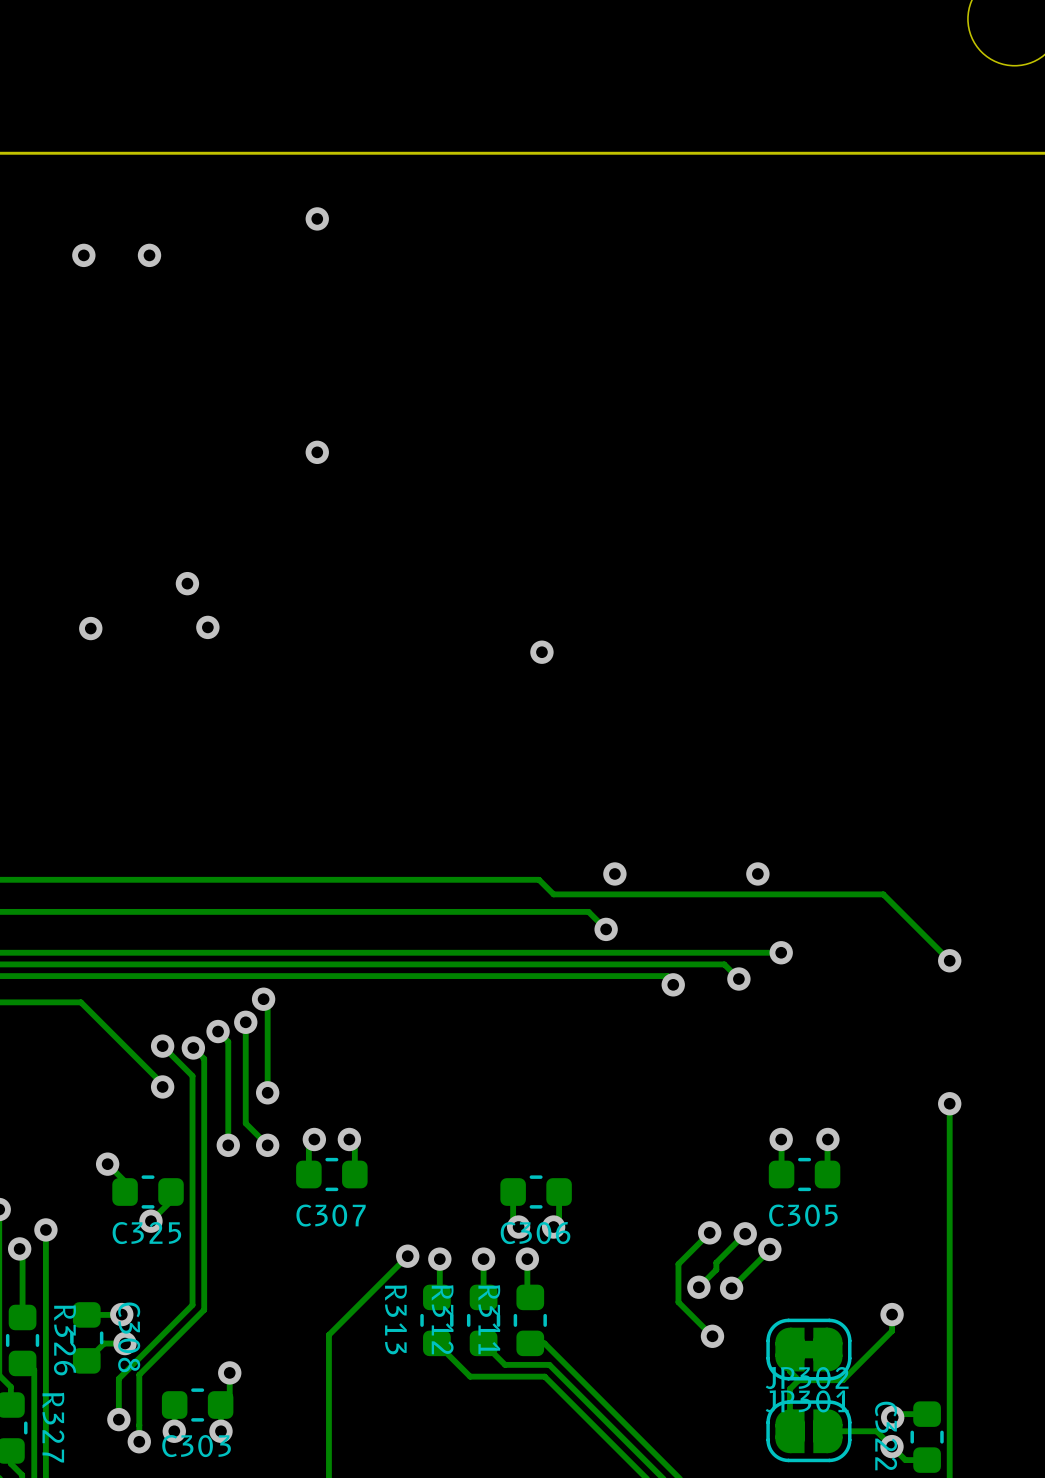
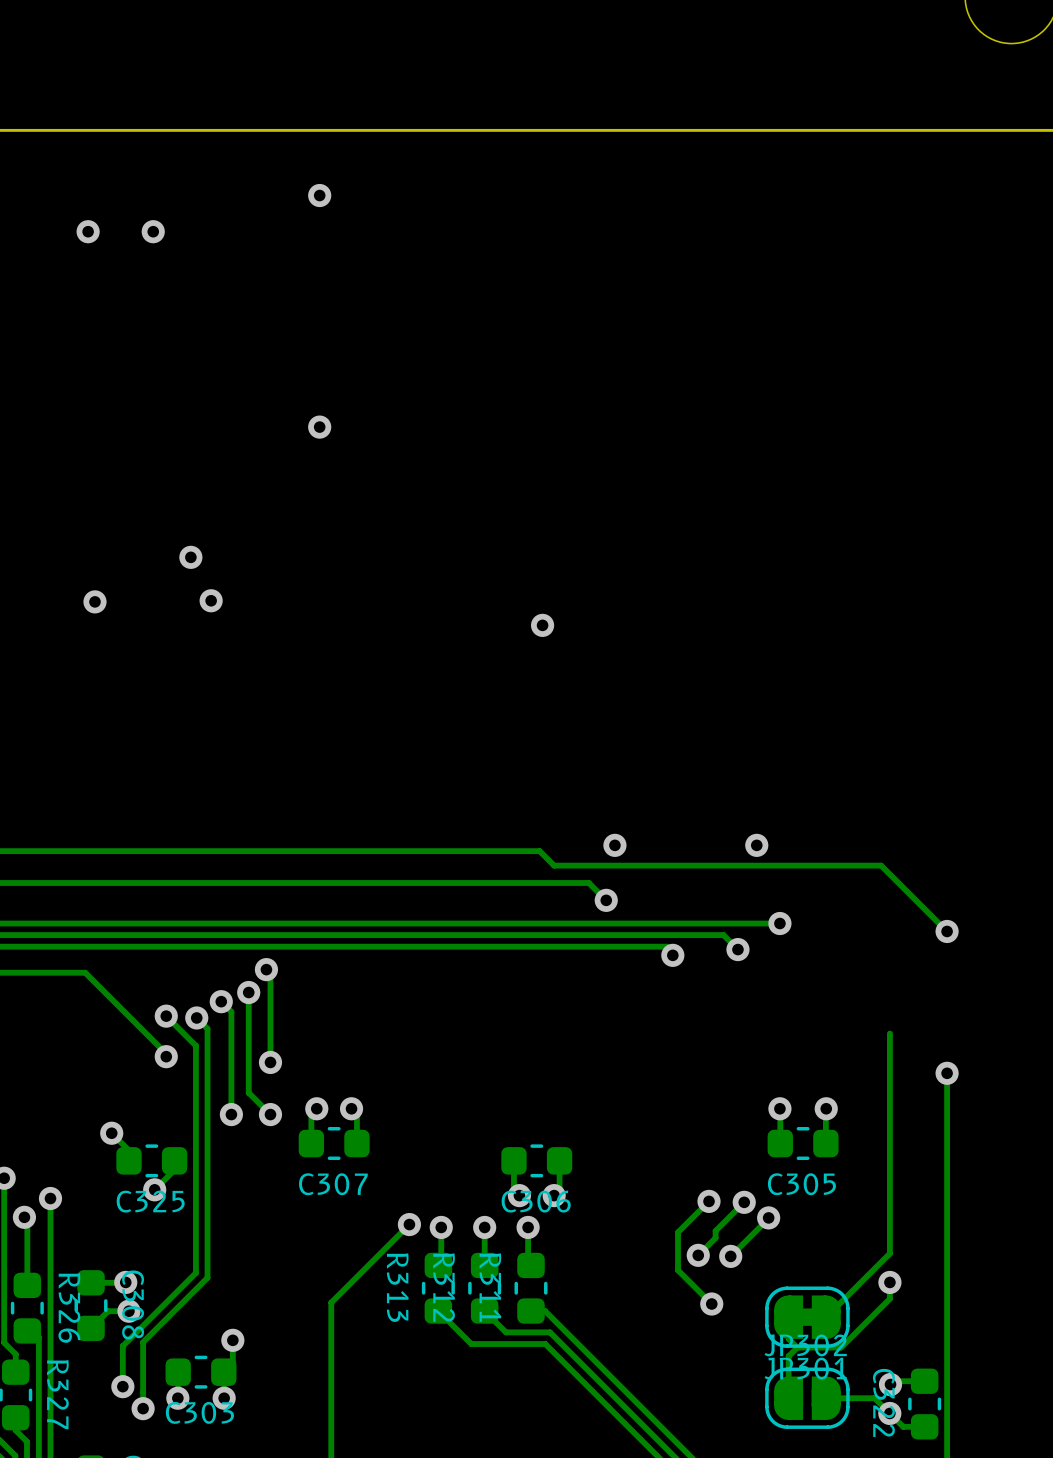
track: none -> (889, 1033) (889, 1253) (826, 1317)

